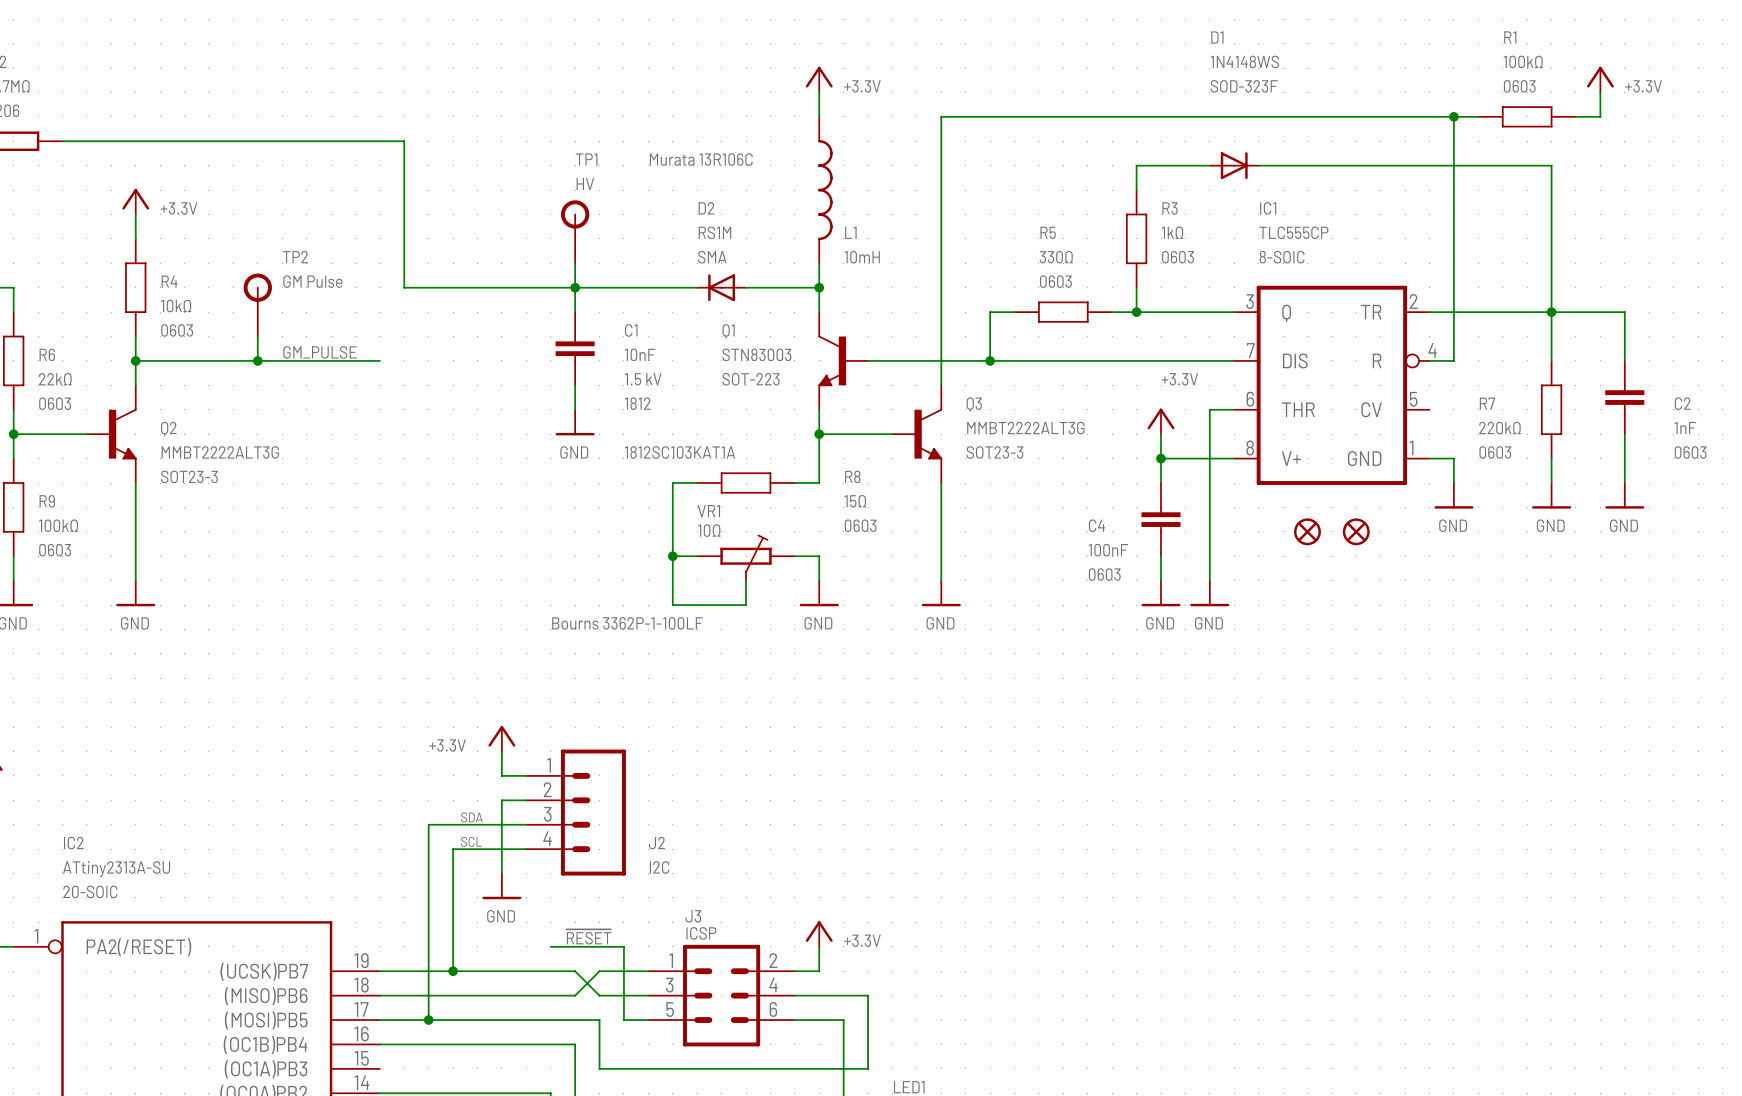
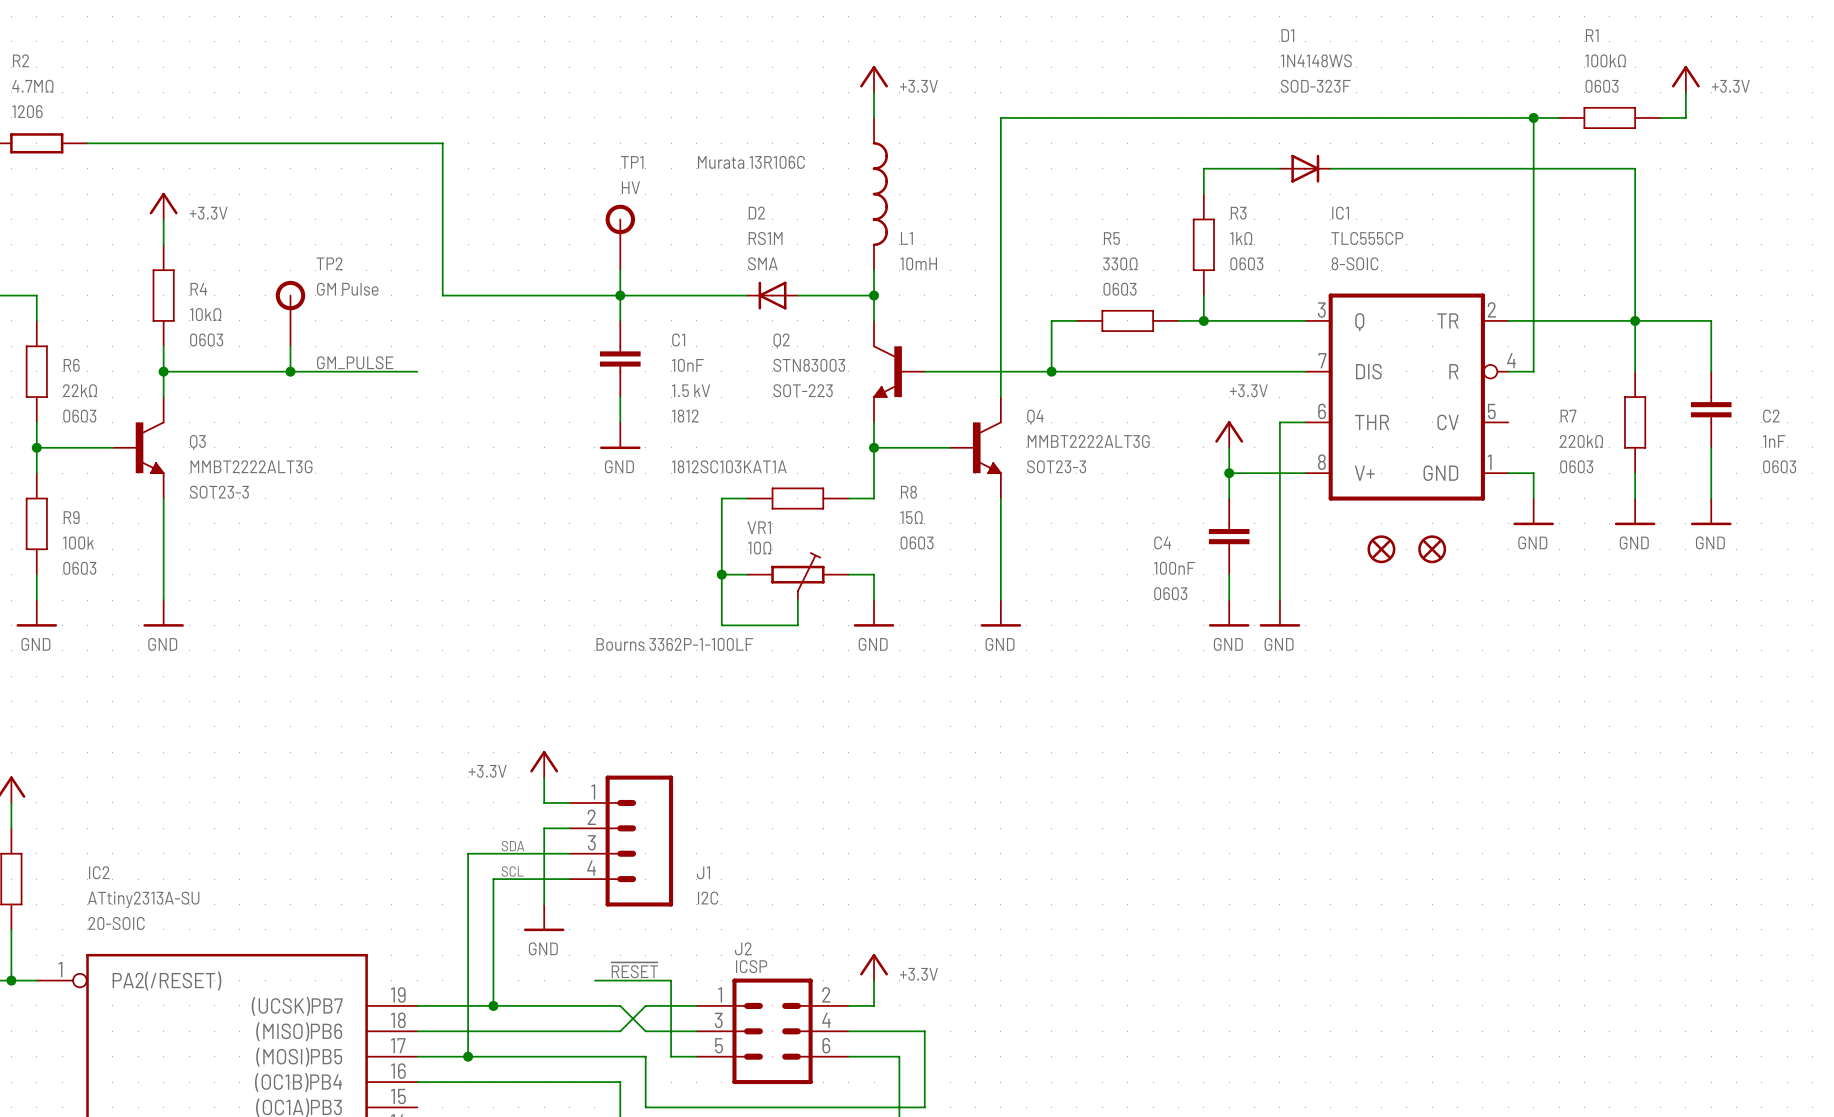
Q1 name: Q1 (728, 331) -> Q2 (781, 340)
Q3 name: Q3 (974, 404) -> Q4 (1035, 417)
Q2 name: Q2 (168, 429) -> Q3 (197, 442)
R9 value: 100kΩ (58, 525) -> 100k (78, 542)
J2 name: J2 (656, 843) -> J1 (703, 872)
J3 name: J3 (693, 916) -> J2 (743, 948)

